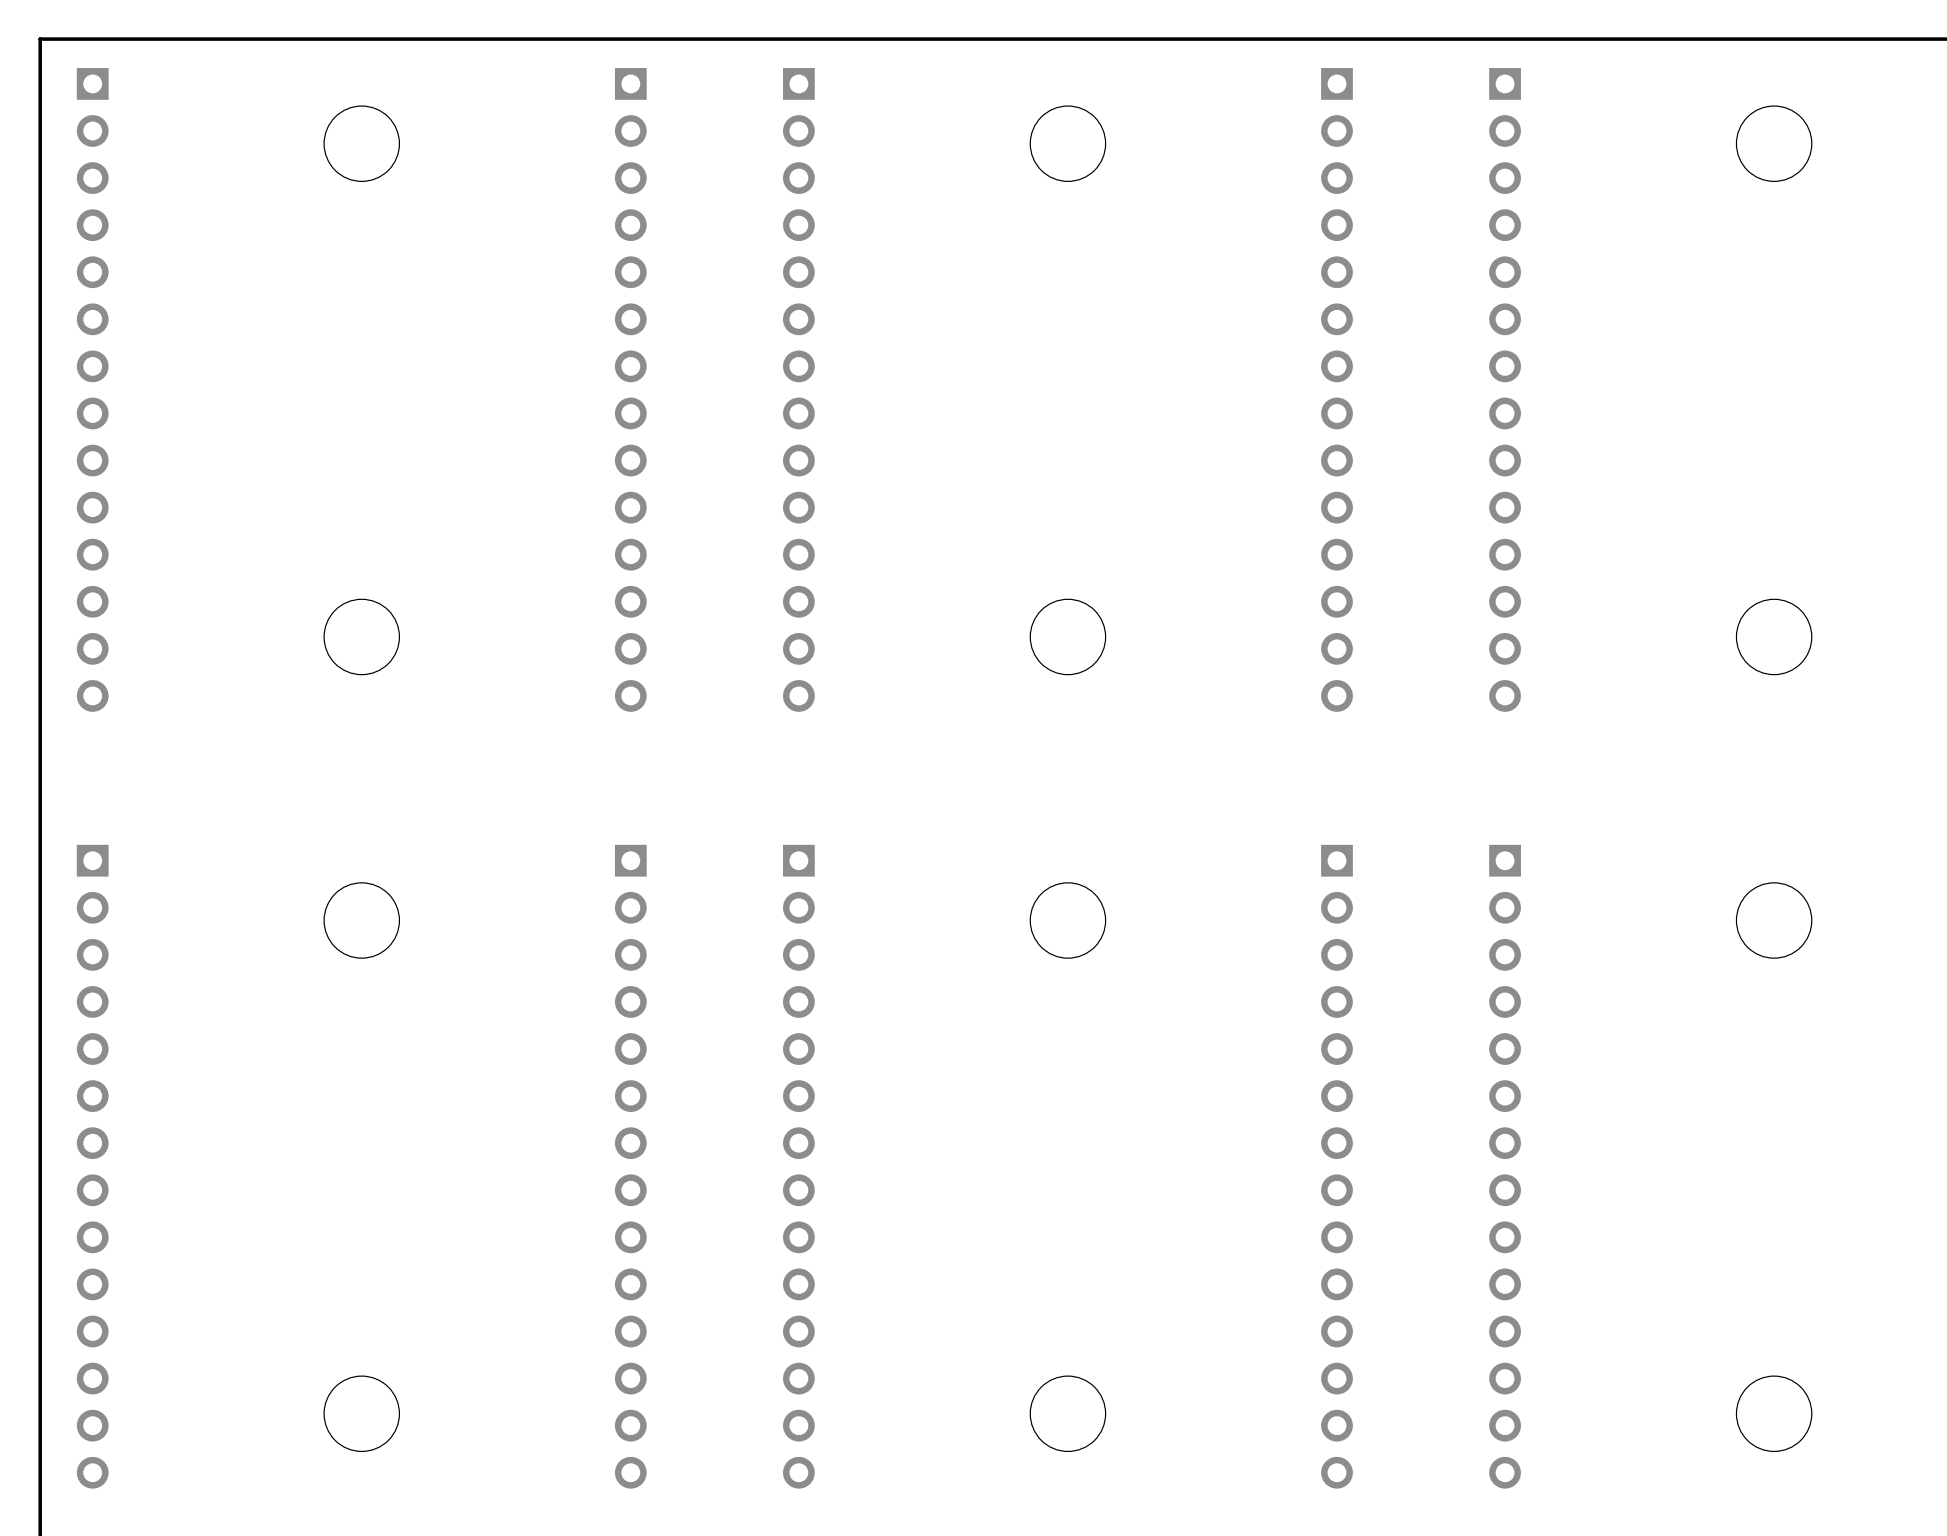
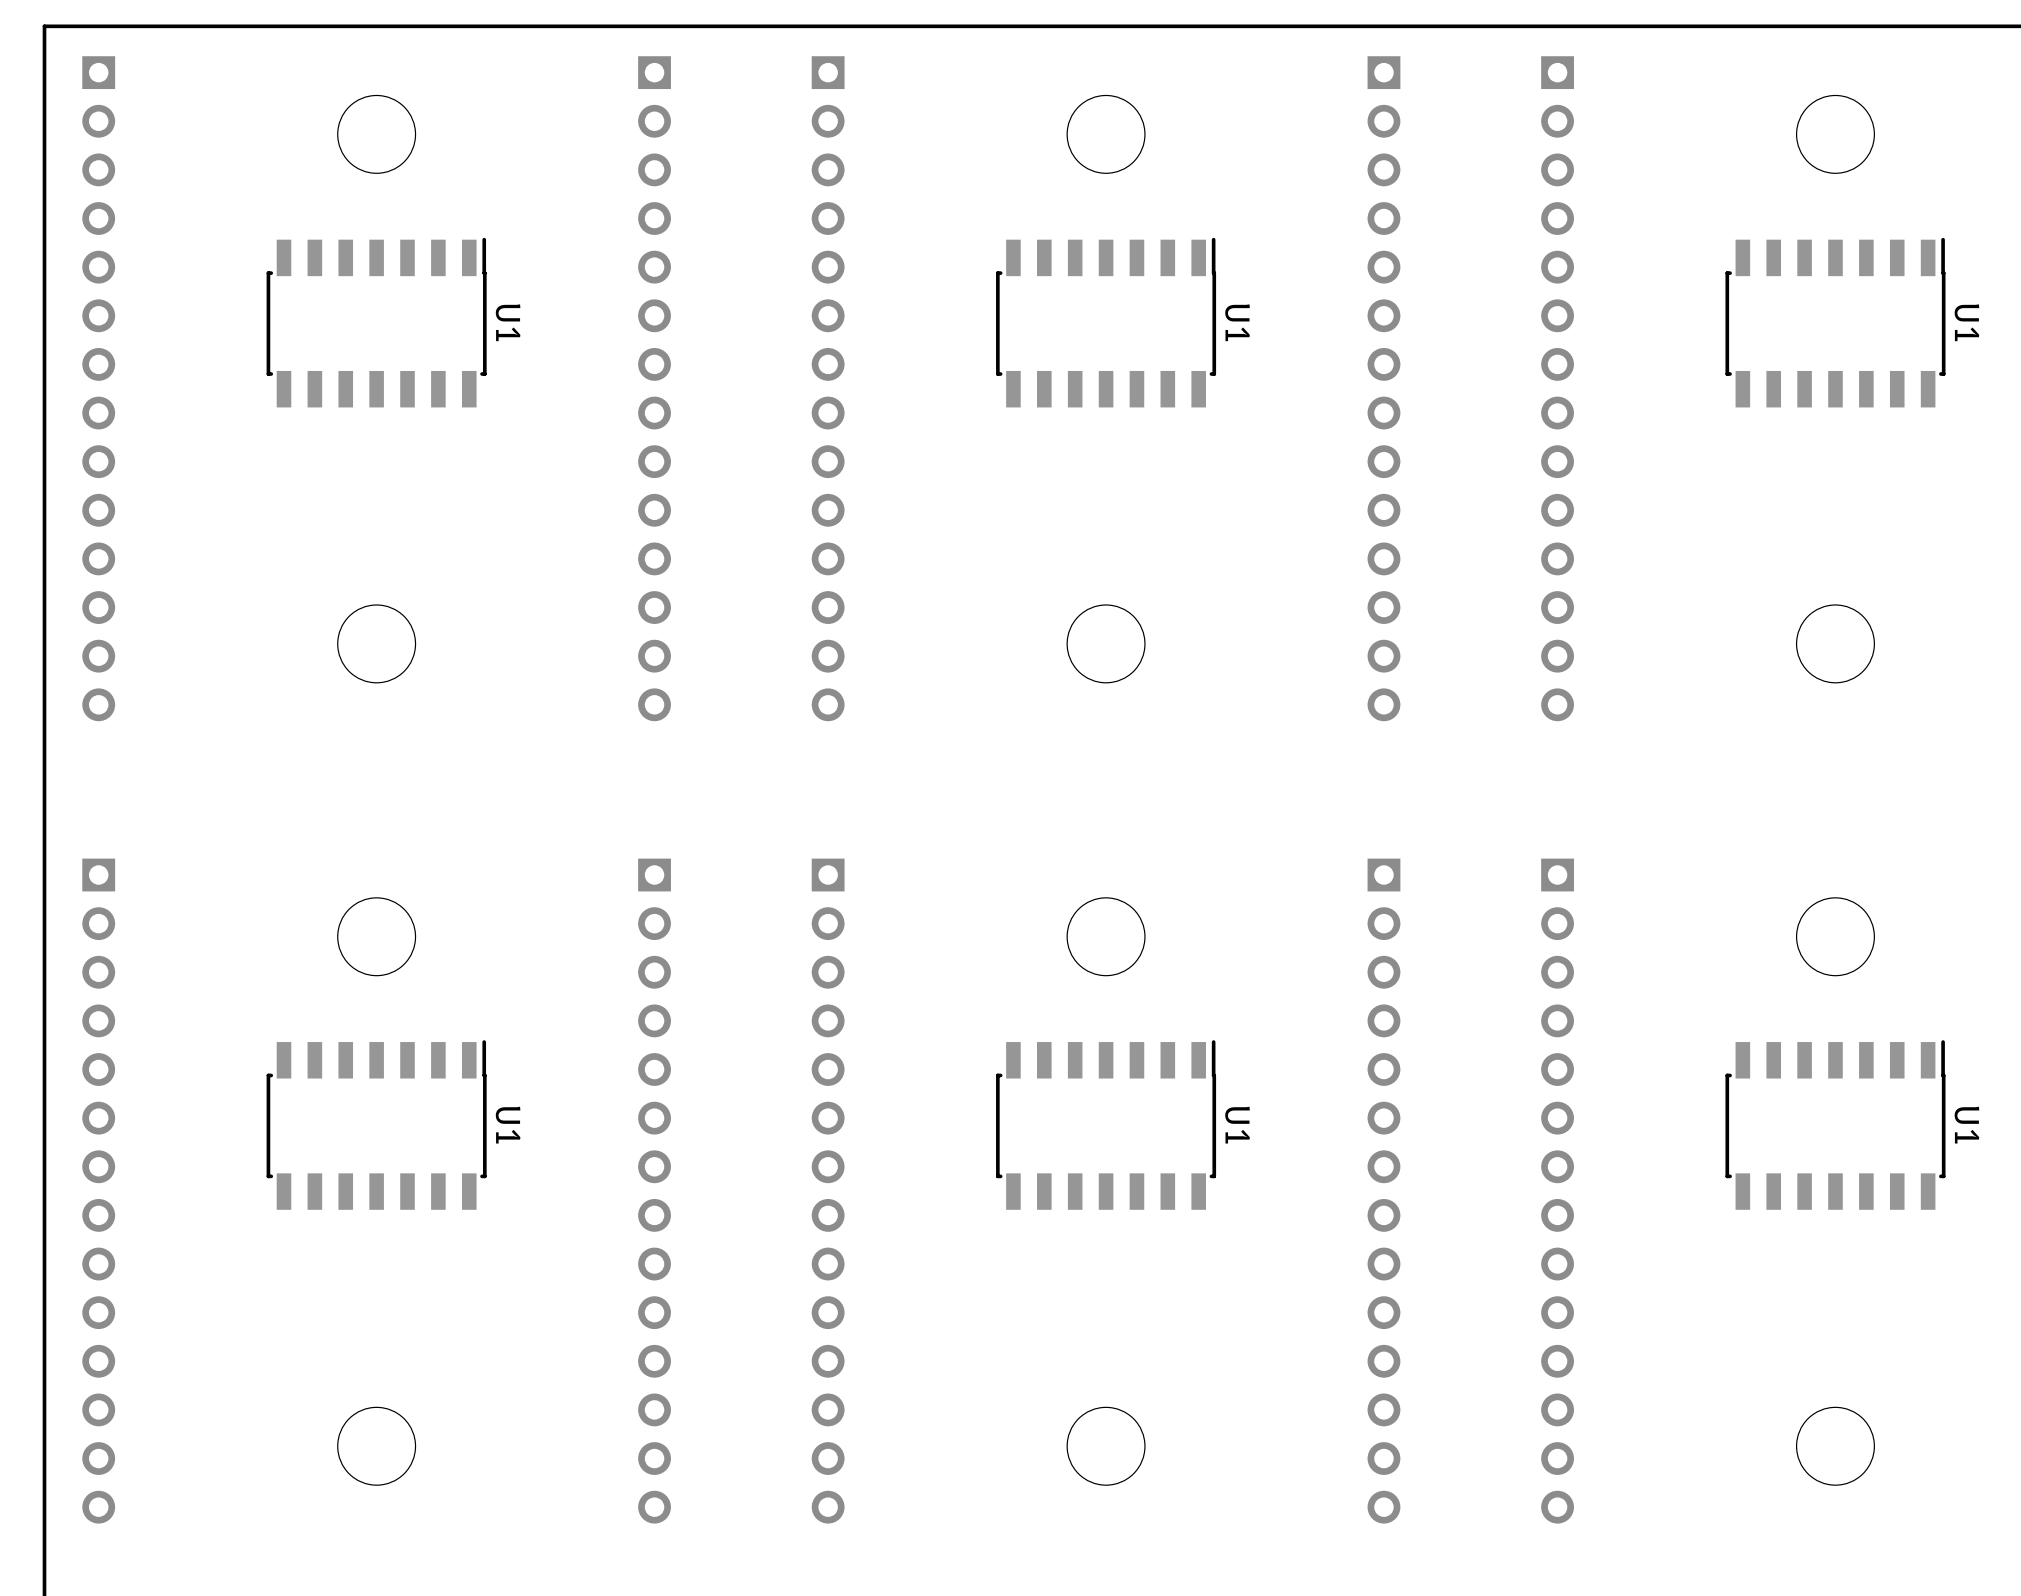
U1: none -> (376, 322)
U1: none -> (1106, 322)
U1: none -> (1835, 322)
U1: none -> (376, 1125)
U1: none -> (1106, 1125)
U1: none -> (1835, 1125)

